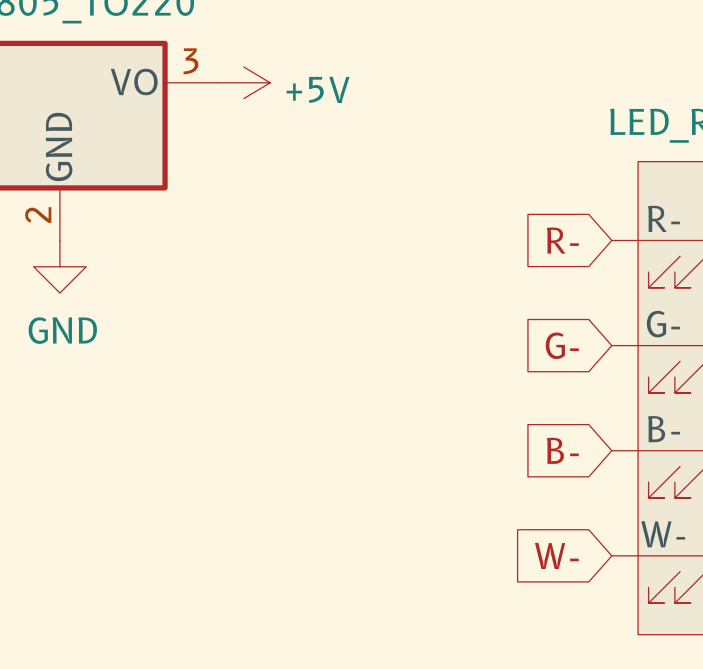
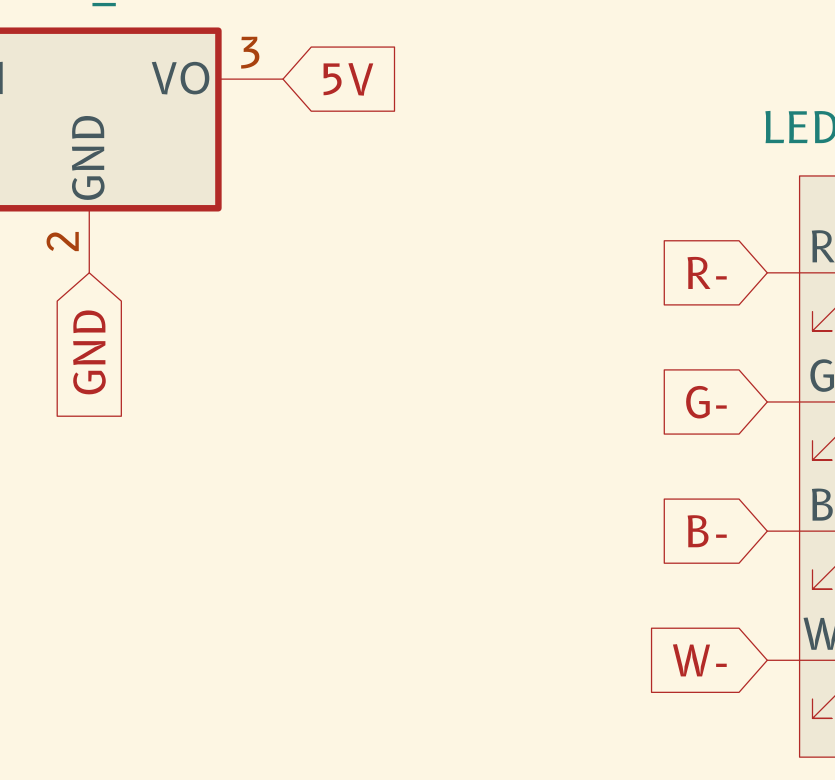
power symbol: +5V (243, 82) -> none
global label: none -> 5V (348, 79)
power symbol: GND (59, 266) -> none
global label: none -> GND (89, 352)

